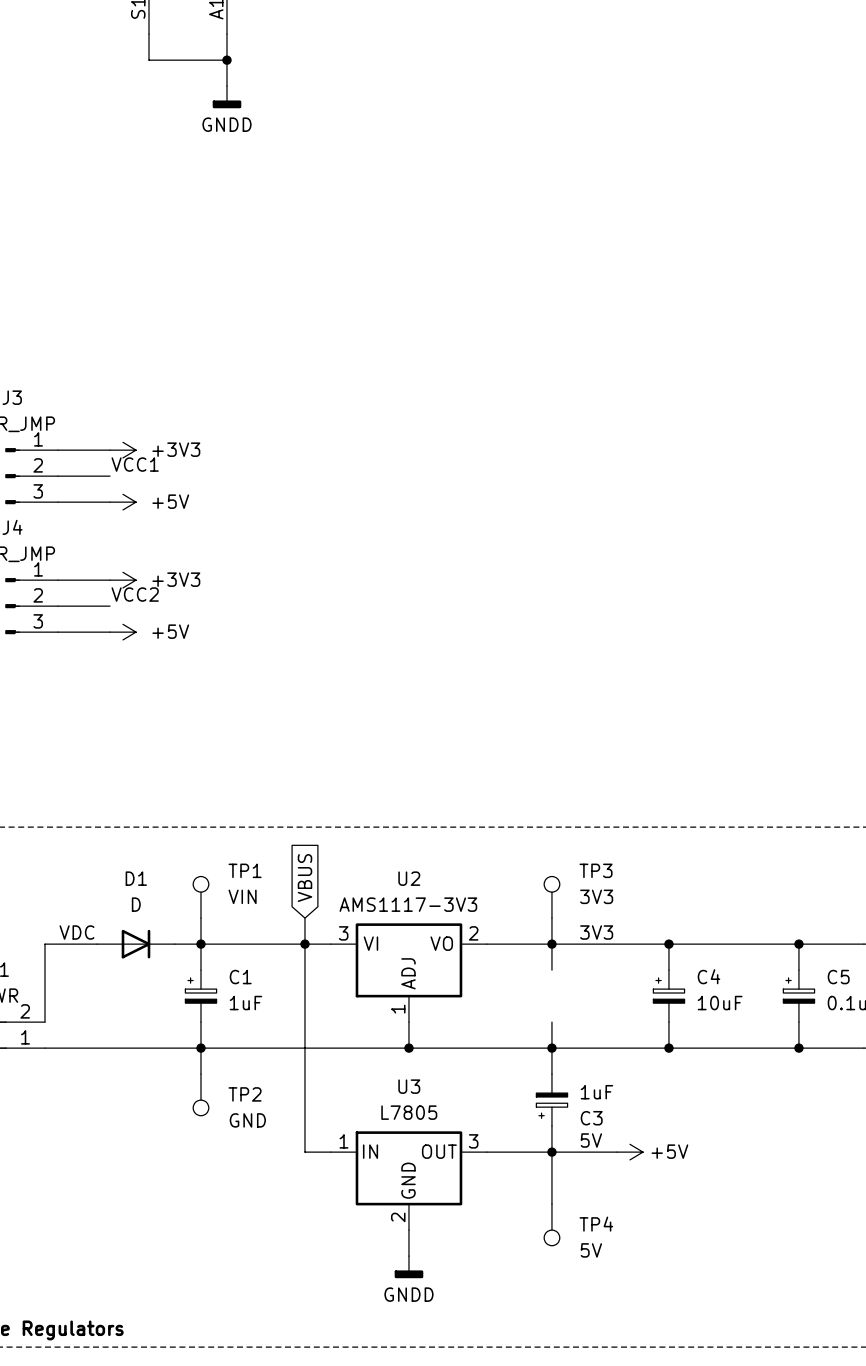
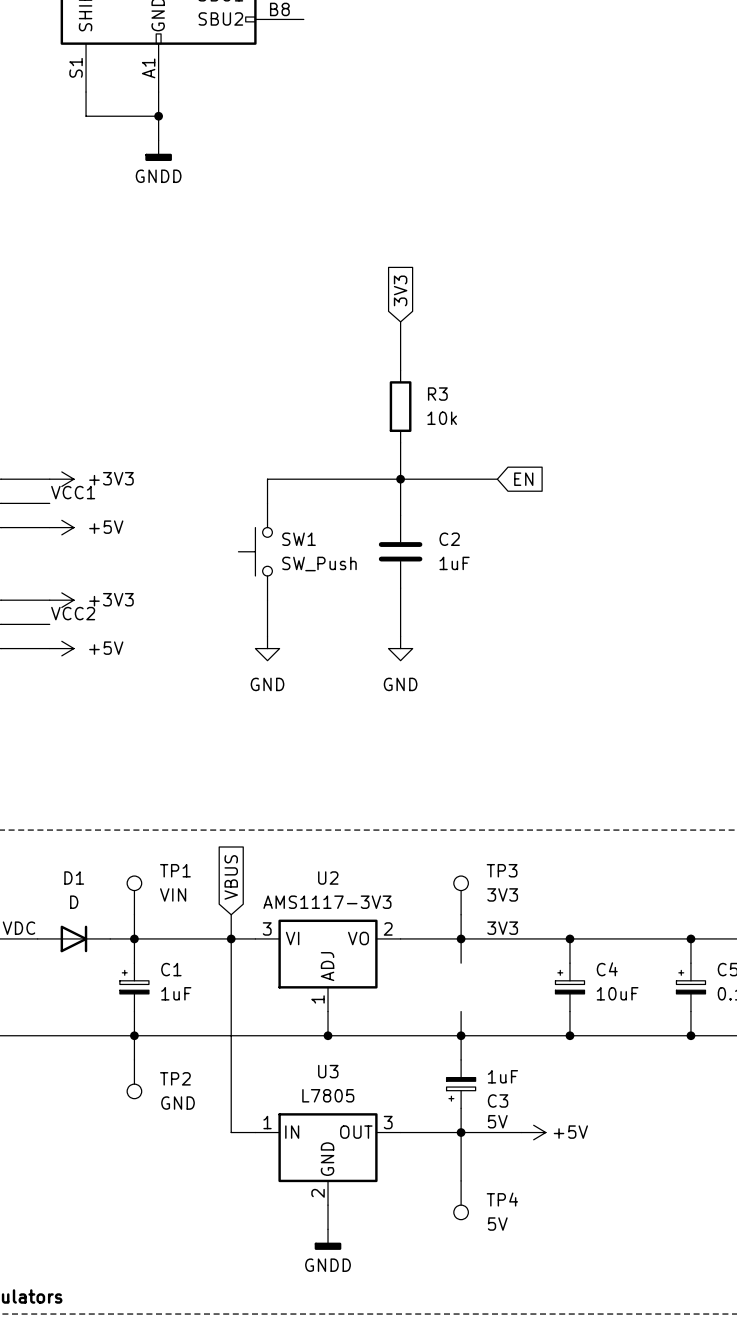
global label: none -> 3V3 (400, 290)
wire: none -> (400, 321) (400, 370)
R3: none -> 10k (400, 406)
wire: none -> (400, 442) (400, 515)
junction: none -> (400, 479)
wire: none -> (497, 479) (267, 479) (267, 503)
global label: none -> EN (523, 479)
SW1: none -> SW_Push (255, 551)
C2: none -> 1uF (400, 551)
wire: none -> (400, 588) (400, 636)
wire: none -> (267, 600) (267, 636)
power symbol: none -> GND (267, 648)
power symbol: none -> GND (400, 648)

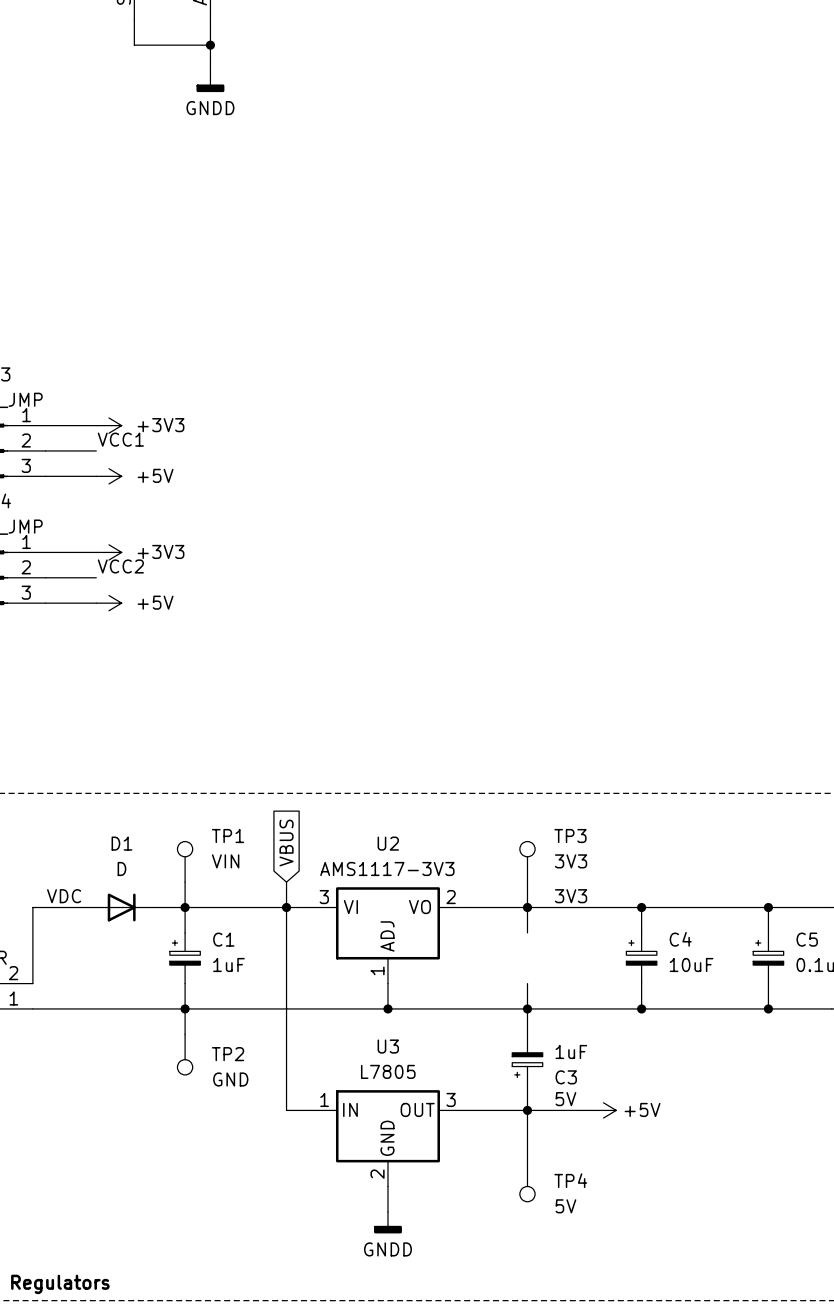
global label: 3V3 (400, 290) -> none
wire: (400, 321) (400, 370) -> none
R3: 10k (400, 406) -> none
wire: (400, 442) (400, 515) -> none
junction: (400, 479) -> none
wire: (497, 479) (267, 479) (267, 503) -> none
global label: EN (523, 479) -> none
SW1: SW_Push (255, 551) -> none
C2: 1uF (400, 551) -> none
wire: (400, 588) (400, 636) -> none
wire: (267, 600) (267, 636) -> none
power symbol: GND (267, 648) -> none
power symbol: GND (400, 648) -> none

